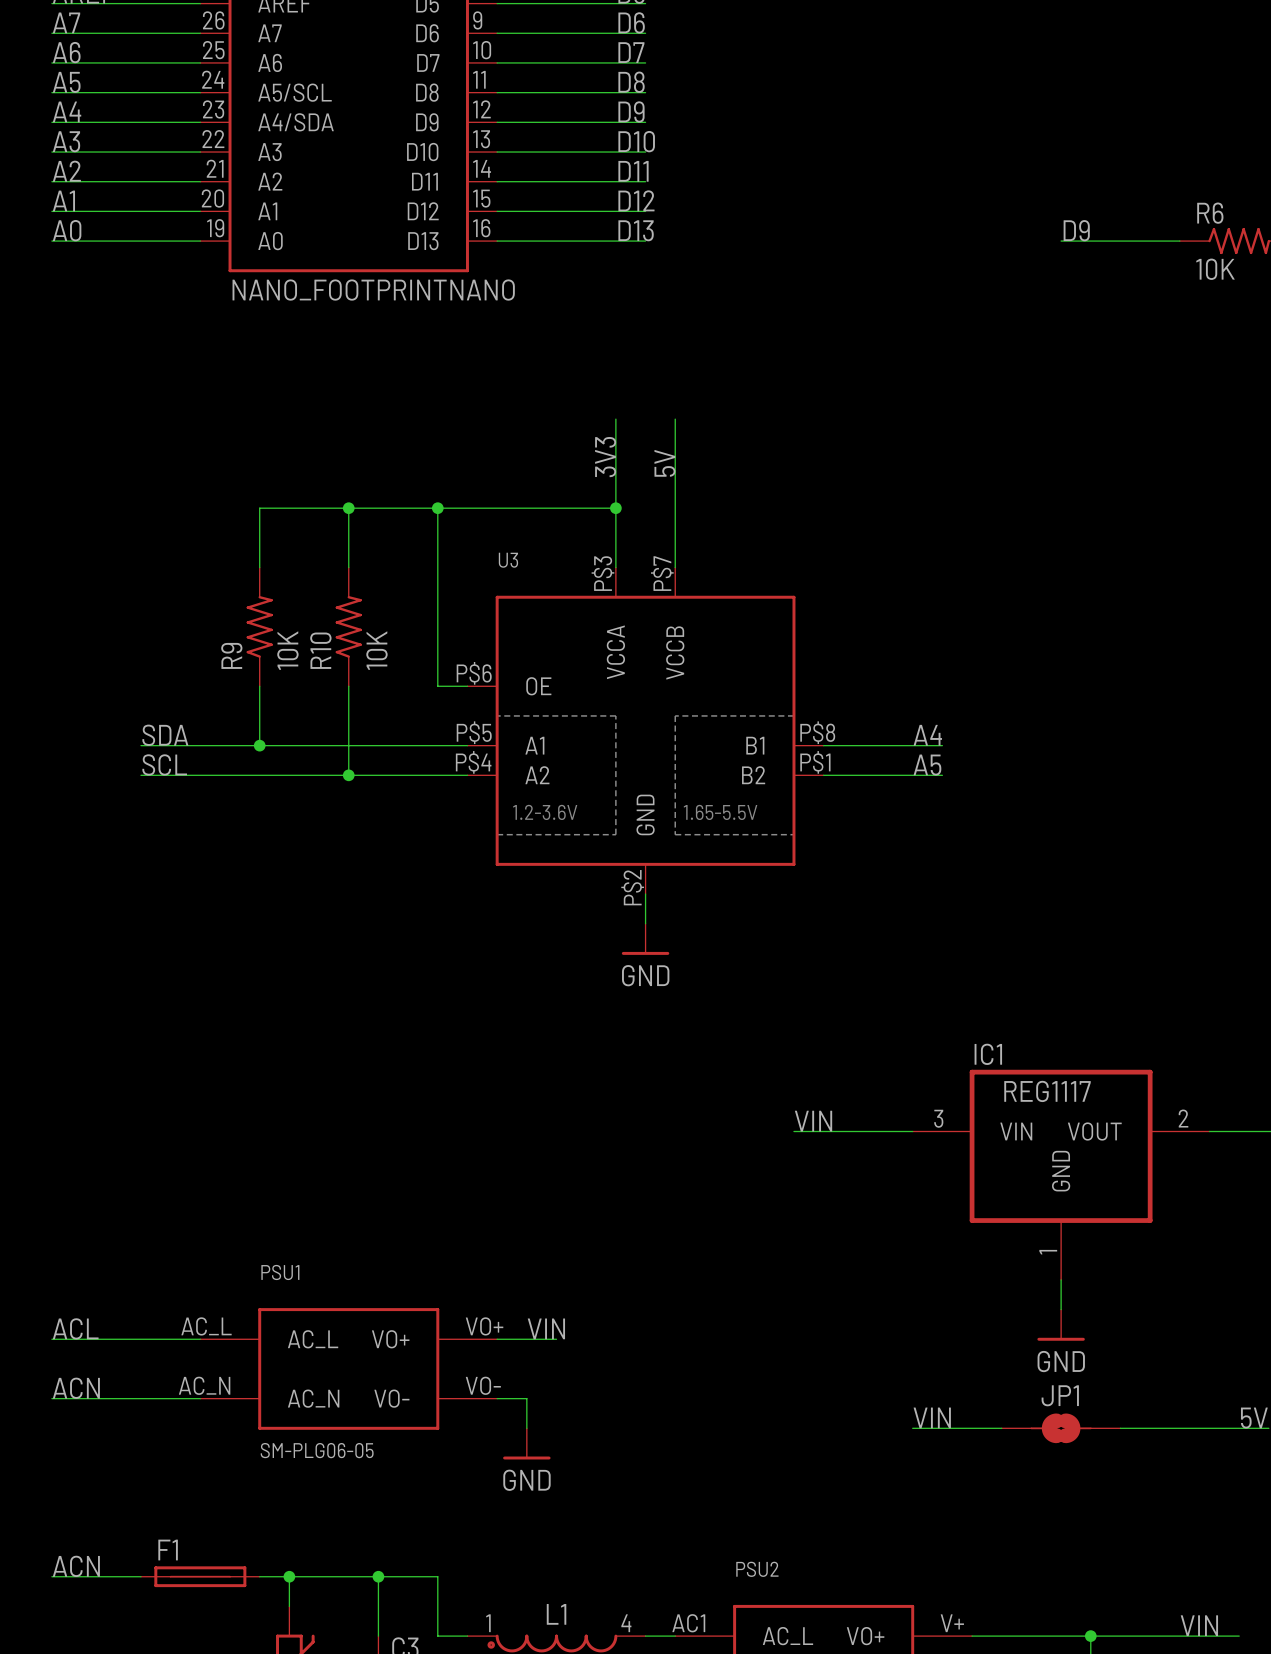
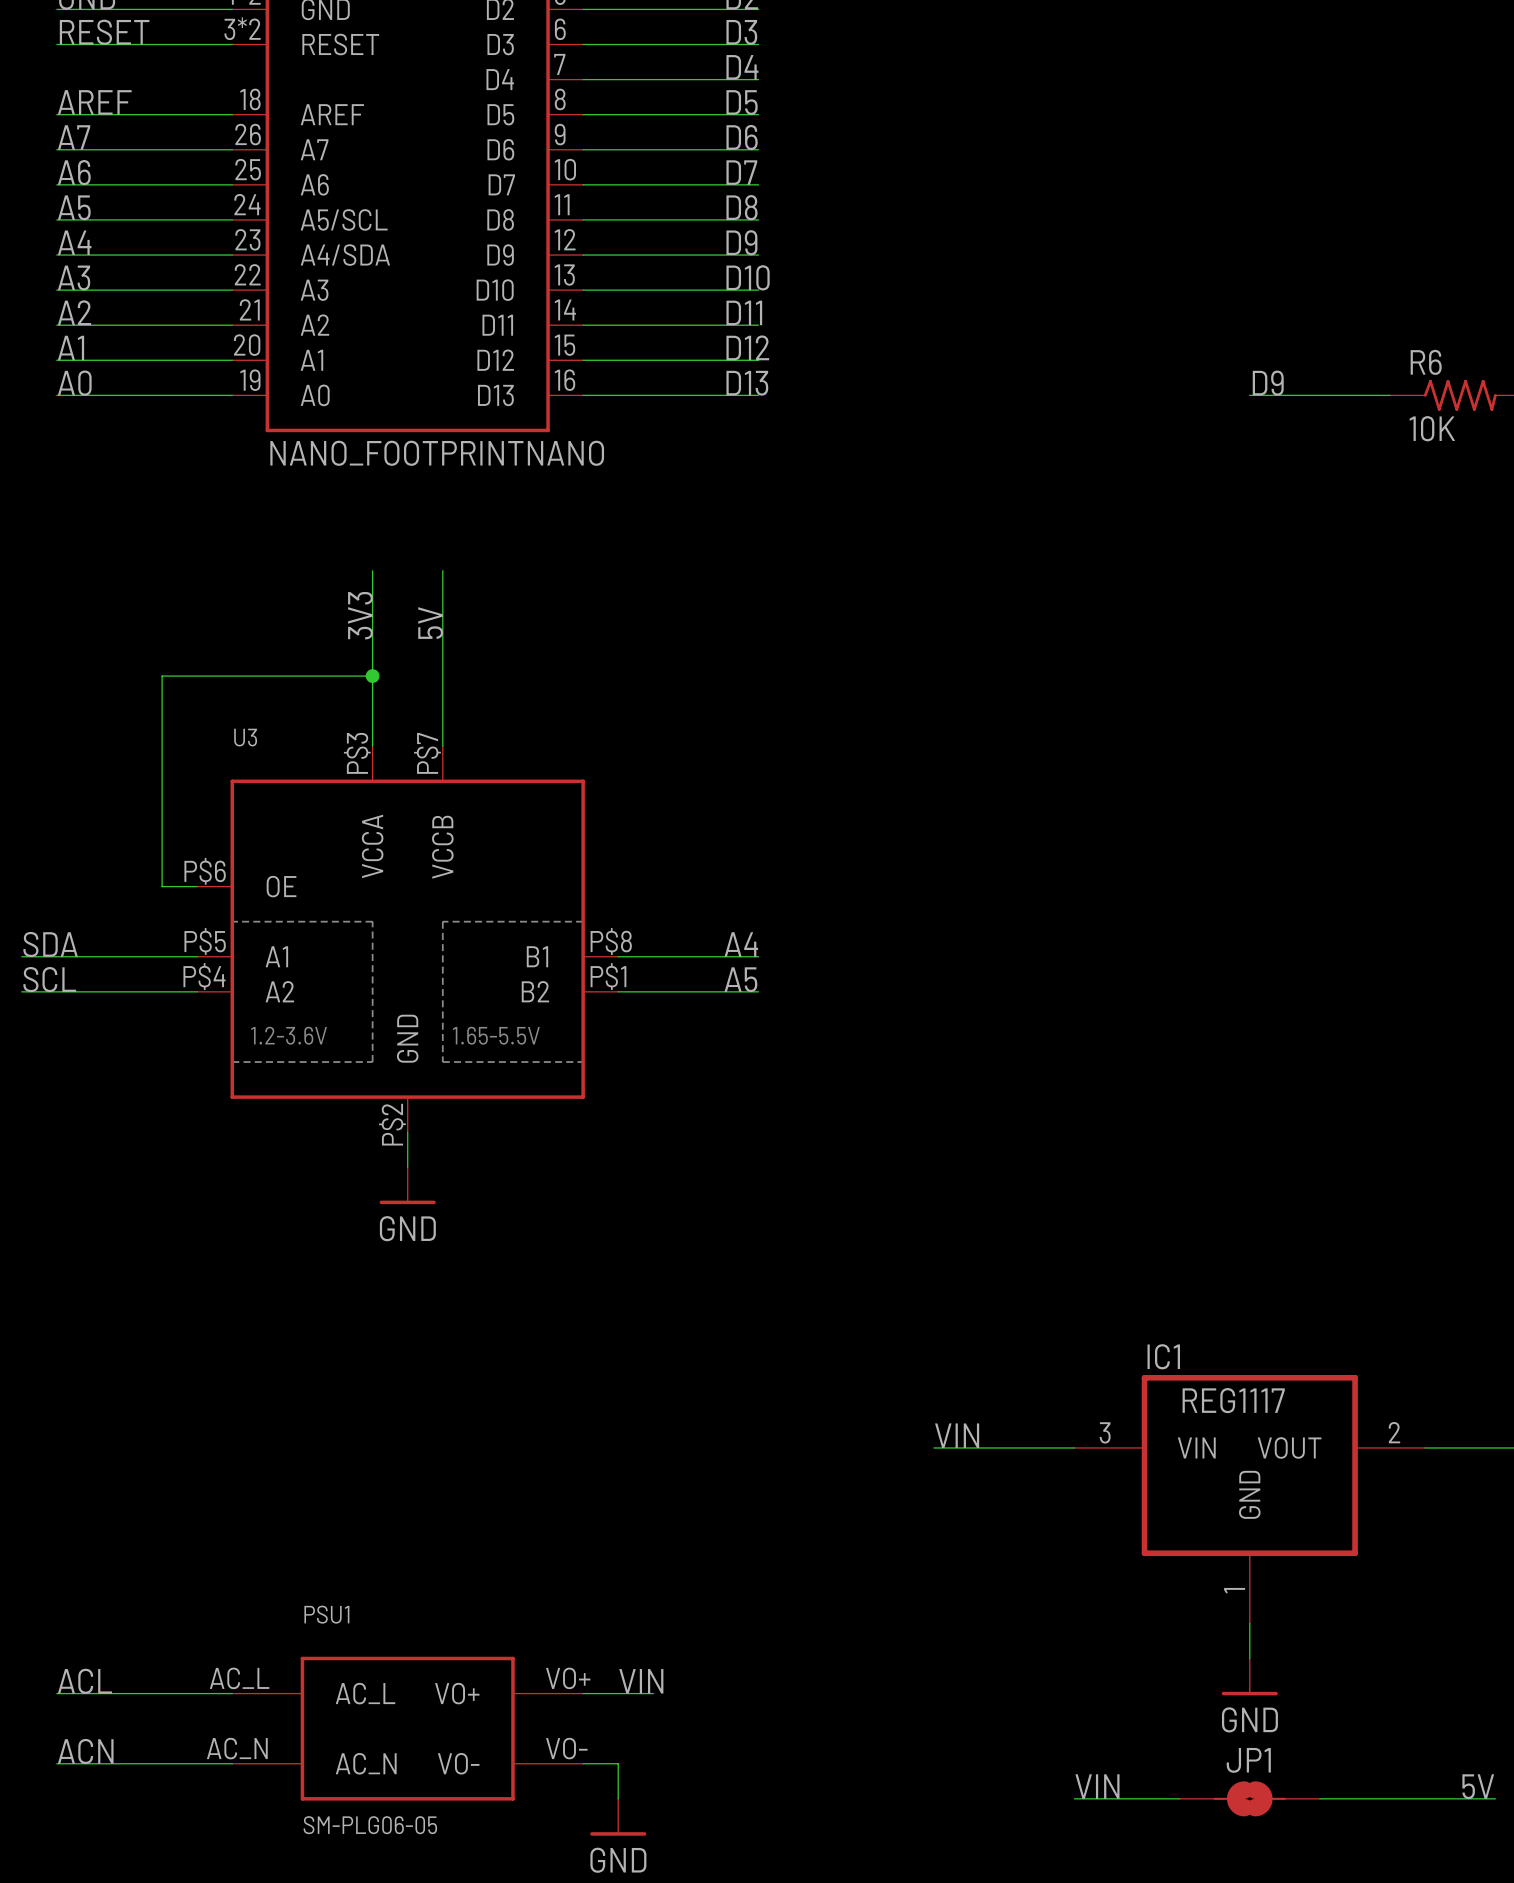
wire: none -> (372, 570) (372, 746)
wire: (615, 419) (615, 567) -> (442, 570) (442, 746)
wire: (675, 419) (675, 567) -> none
label: none -> 3V3 (360, 615)
label: none -> 5V (430, 623)
label: 3V3 (605, 457) -> none
label: 5V (664, 463) -> none
wire: none -> (372, 676) (162, 676) (162, 886) (197, 886)
wire: (348, 508) (348, 567) -> none
junction position: (348, 508) -> (372, 676)
wire: (437, 508) (437, 686) (467, 686) -> none
junction: (437, 508) -> none
wire: (615, 508) (259, 508) (259, 567) -> none
junction: (615, 508) -> none
R9: 10K (259, 626) -> none
R10: 10K (348, 626) -> none
wire: (259, 686) (259, 745) -> none
wire: (348, 686) (348, 775) -> none
label: none -> A4 (741, 944)
wire: none -> (21, 956) (197, 956)
wire: none -> (618, 956) (758, 956)
U3 position: (645, 730) -> (407, 939)
label position: SDA (165, 735) -> SDA (50, 944)
label: none -> A5 (740, 979)
label: A4 (927, 735) -> none
wire: none -> (21, 991) (162, 991)
wire: (170, 745) (467, 745) -> none
junction: (259, 745) -> none
wire: none -> (618, 991) (758, 991)
wire: (823, 745) (942, 745) -> none
label position: SCL (164, 764) -> SCL (49, 979)
label: A5 (927, 765) -> none
wire: (140, 775) (467, 775) -> none
junction: (348, 775) -> none
wire: (823, 775) (942, 775) -> none
wire: none -> (407, 1132) (407, 1167)
wire: (645, 894) (645, 923) -> none
power symbol: none -> GND (407, 1185)
power symbol: GND (645, 939) -> none

